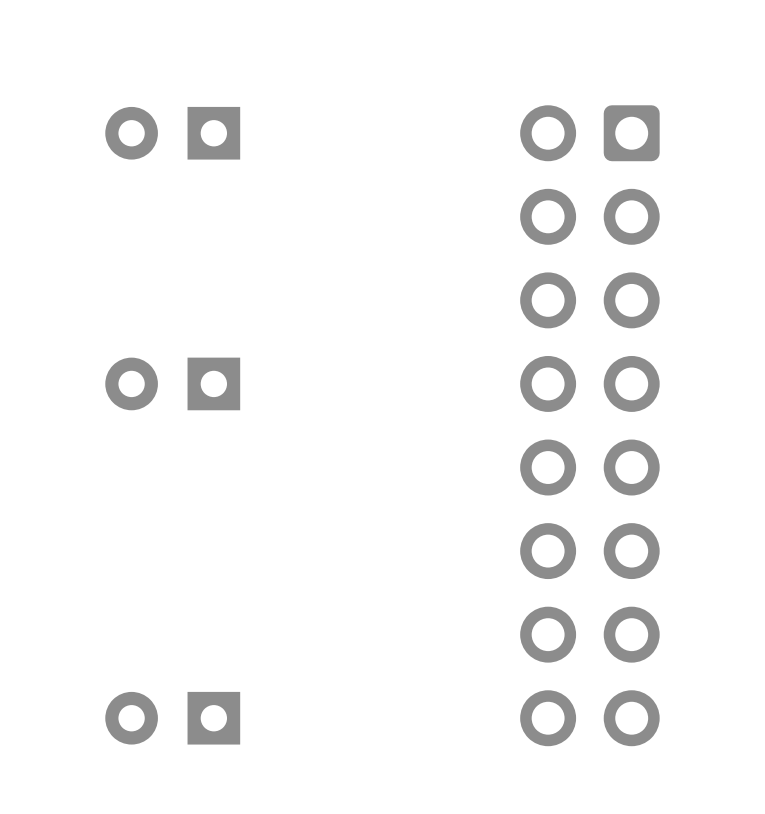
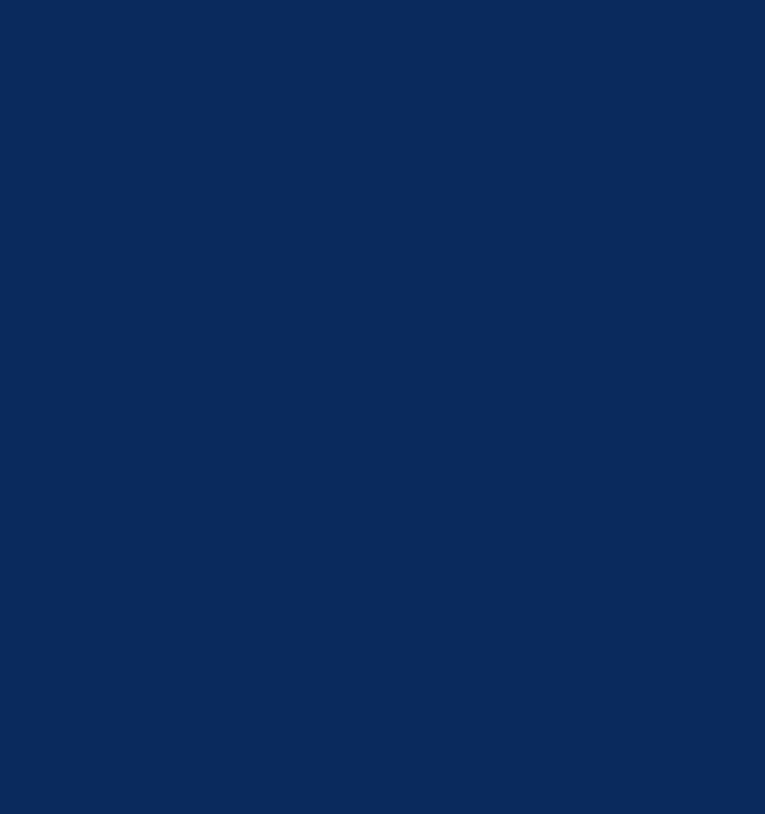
part: (172, 133) -> none
part: (172, 383) -> none
part: (589, 425) -> none
part: (172, 718) -> none

